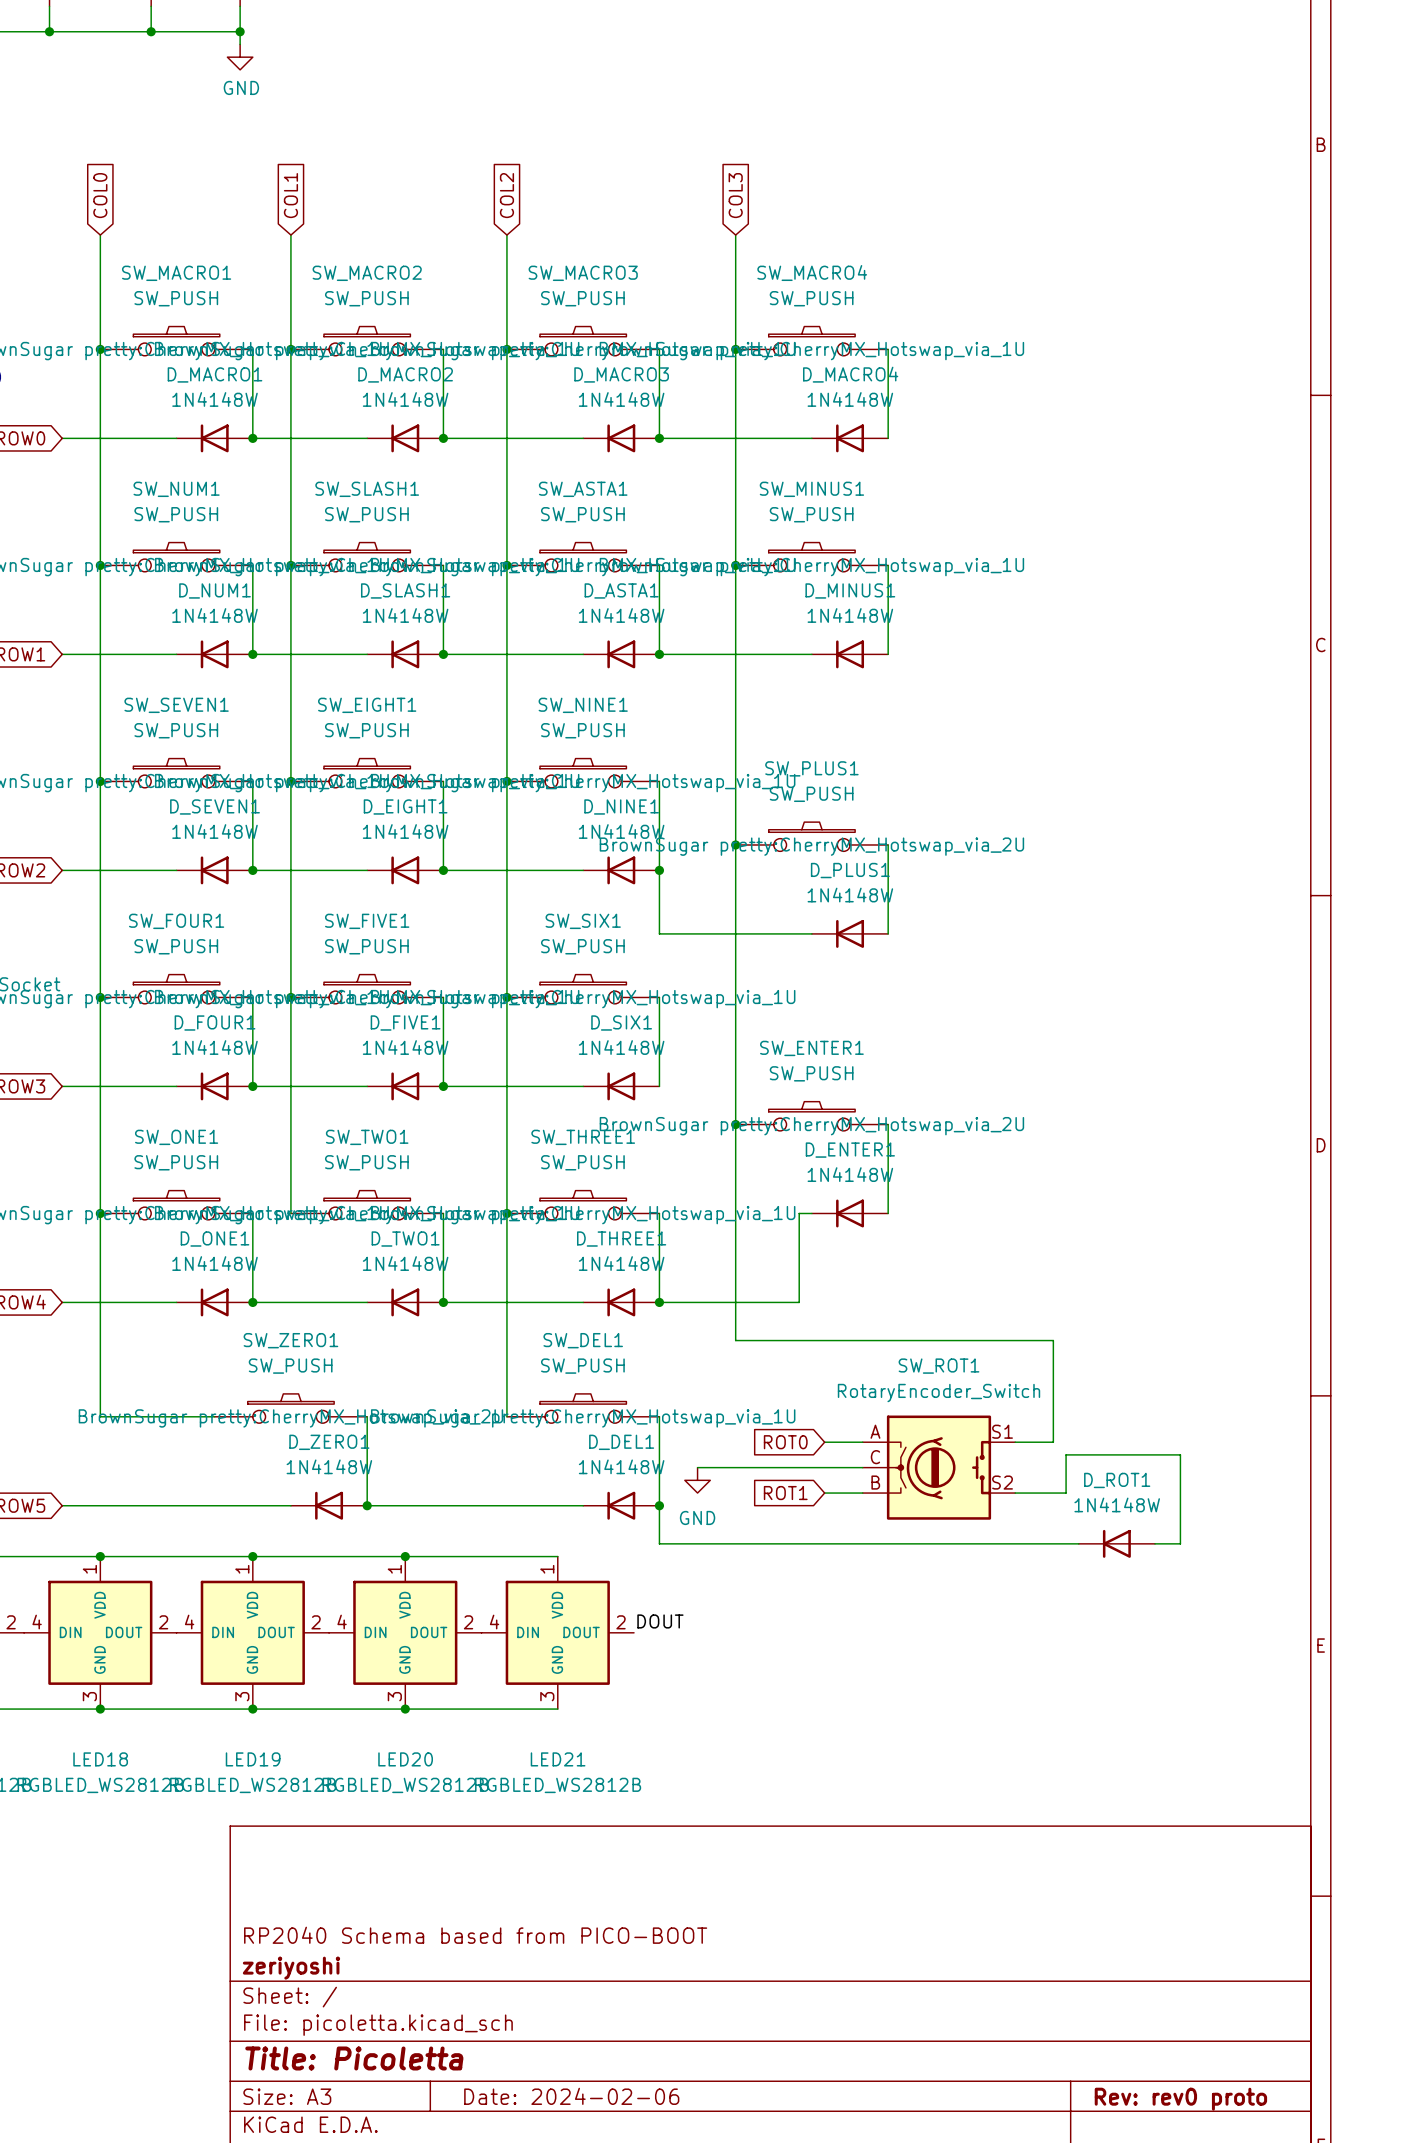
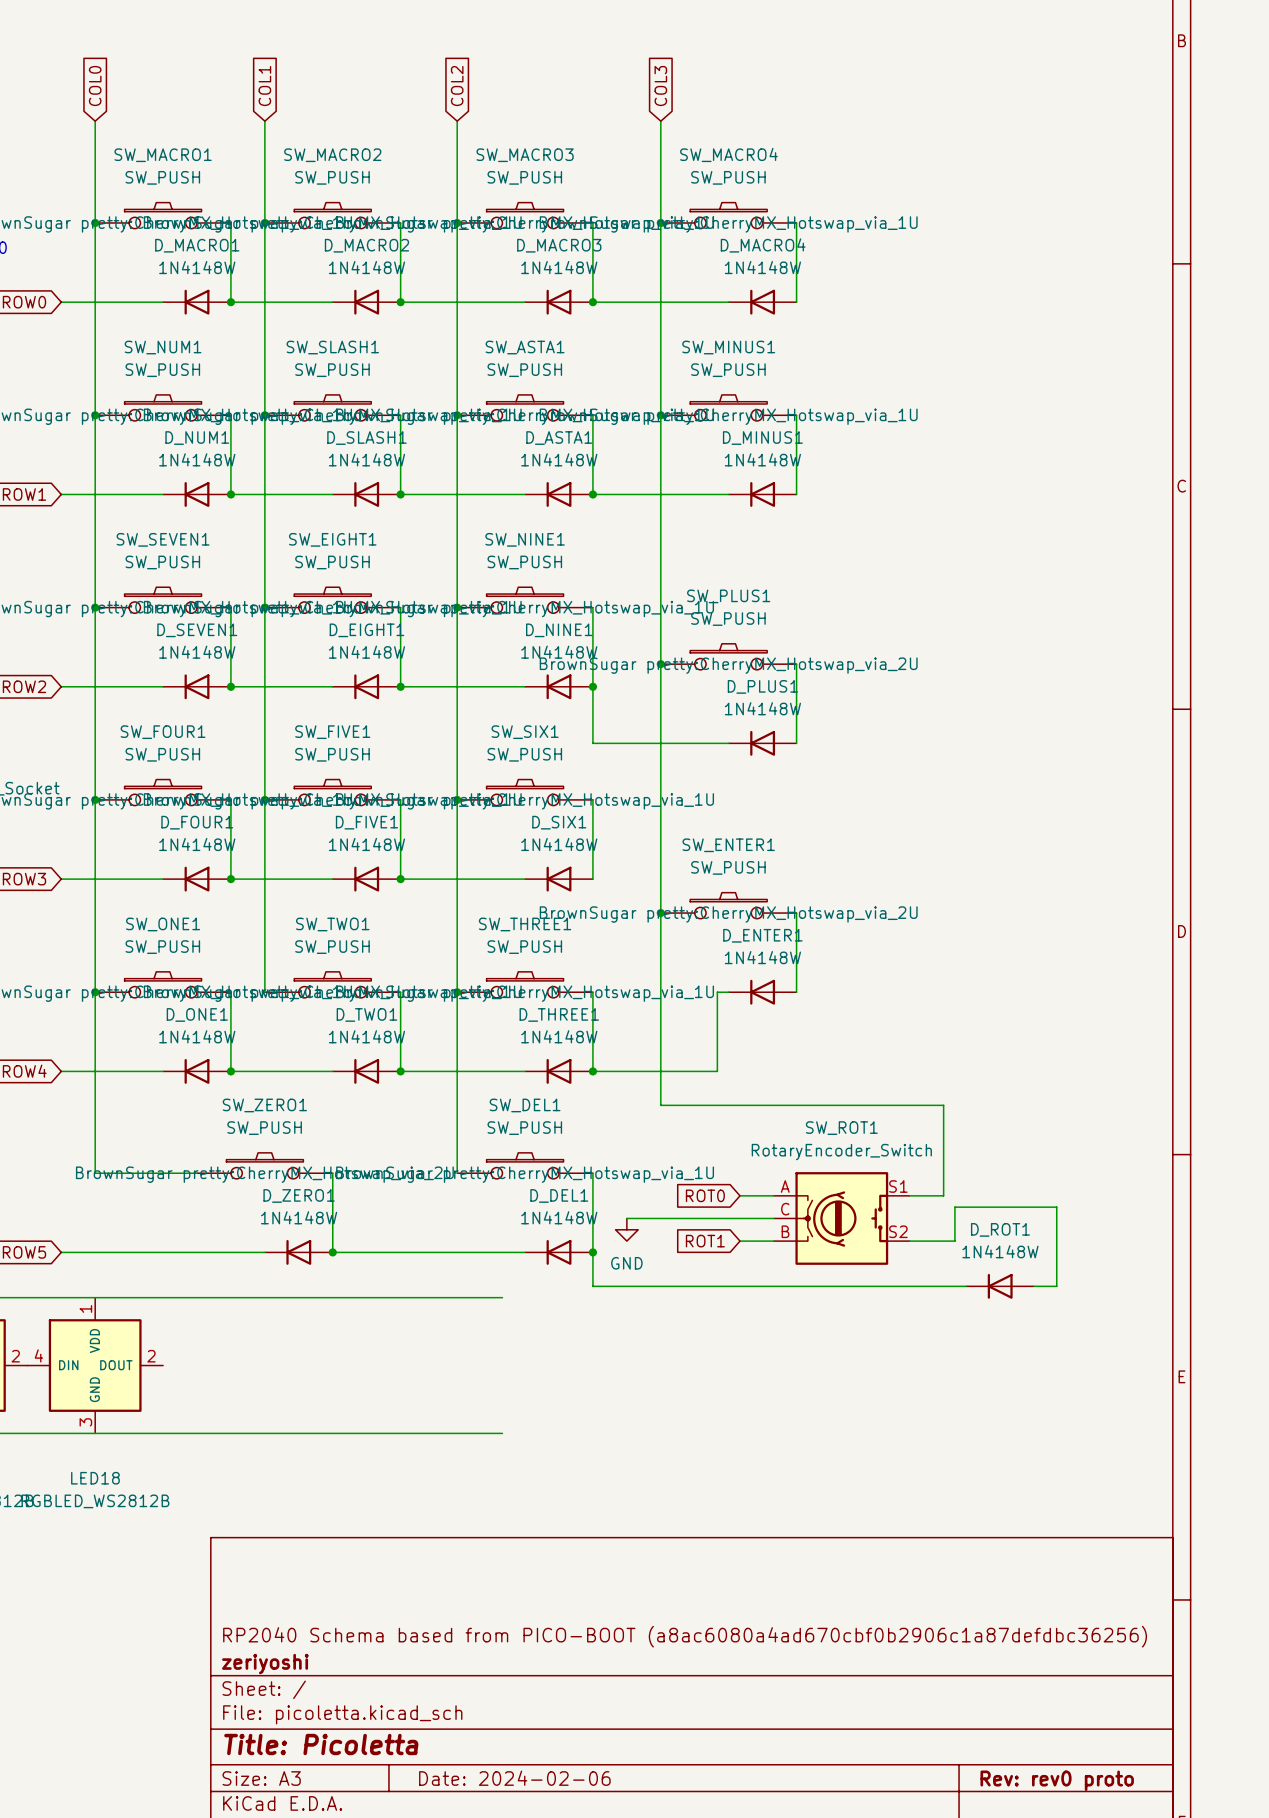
junction: (100, 1556) -> none
junction: (252, 1556) -> none
junction: (405, 1556) -> none
label: DOUT (660, 1621) -> none
LED19: RGBLED_WS2812B (252, 1632) -> none
LED20: RGBLED_WS2812B (405, 1632) -> none
LED21: RGBLED_WS2812B (557, 1632) -> none
junction: (100, 1709) -> none
junction: (252, 1709) -> none
junction: (405, 1709) -> none
title block: RP2040 Schema based from PICO-BOOT (475, 1935) -> RP2040 Schema based from PICO-BOOT (a8ac6080a4ad670cbf0b2906c1a87defdbc36256) (685, 1636)

